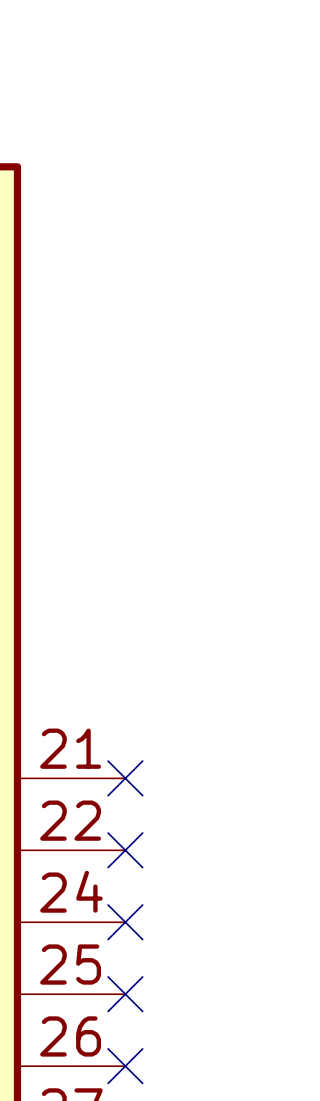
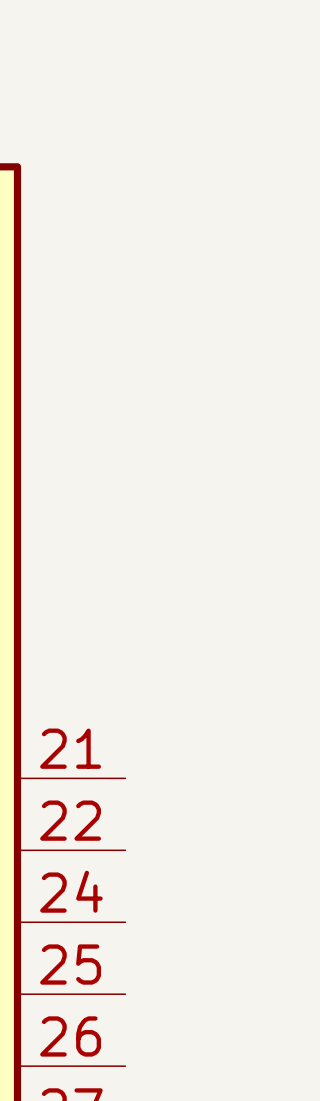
no-connect mark: (125, 778) -> none
no-connect mark: (125, 850) -> none
no-connect mark: (125, 922) -> none
no-connect mark: (125, 994) -> none
no-connect mark: (125, 1066) -> none

